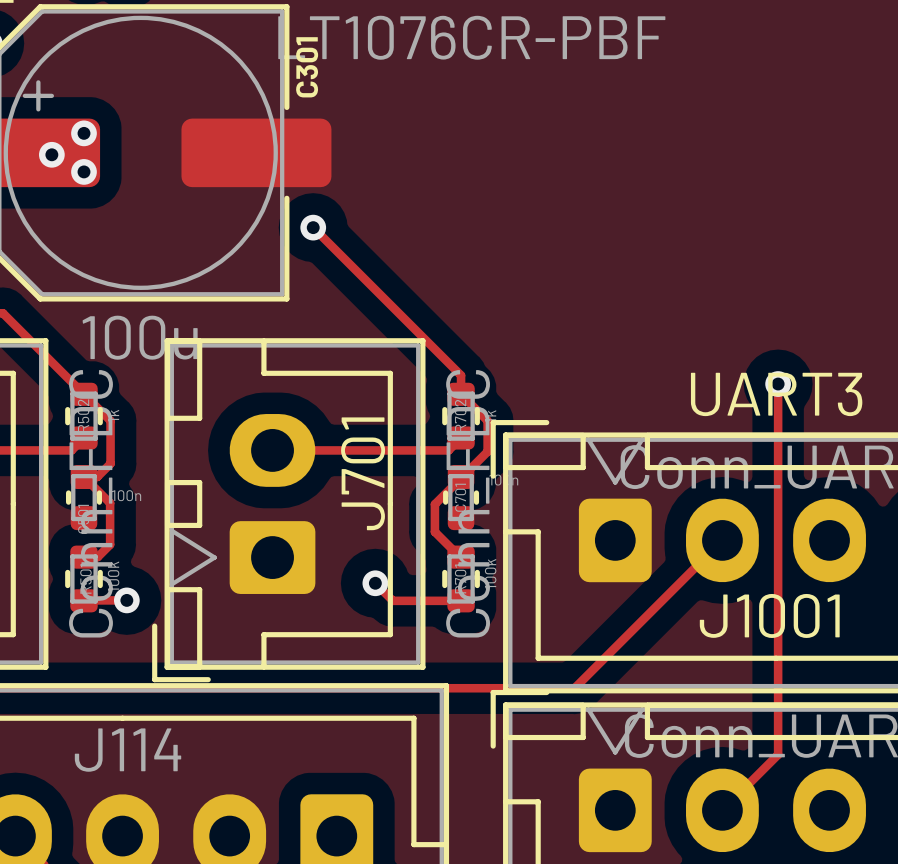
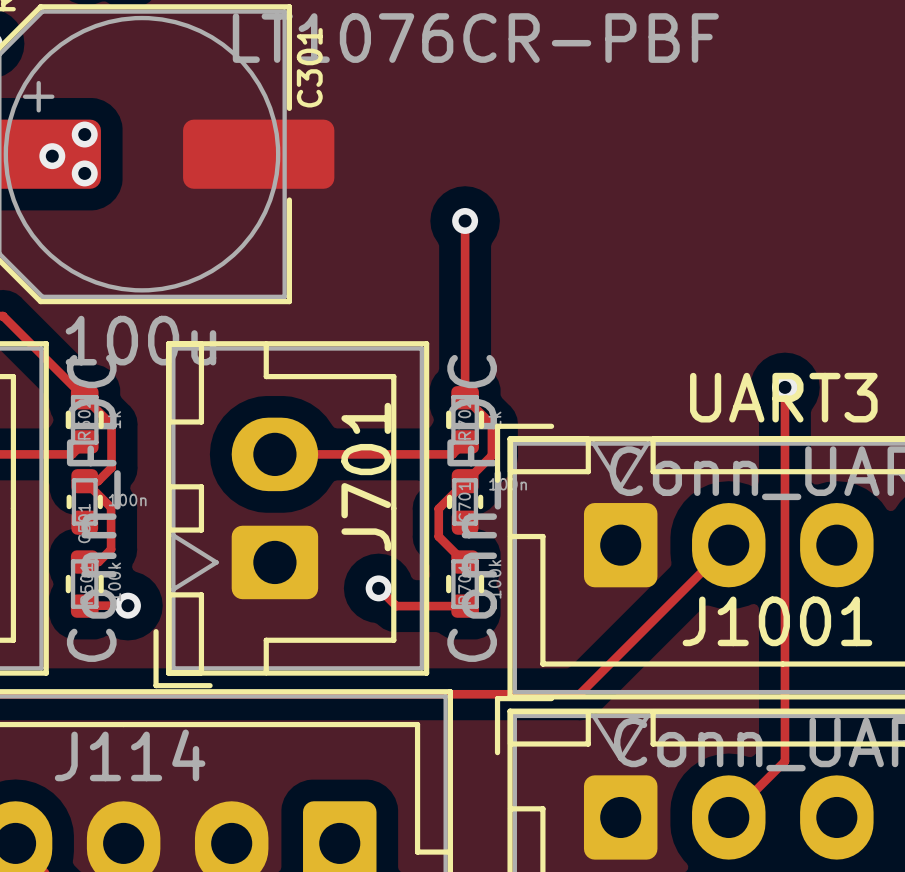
track: (313, 227) (461, 375) -> (465, 220) (465, 378)
via position: (313, 227) -> (465, 220)

